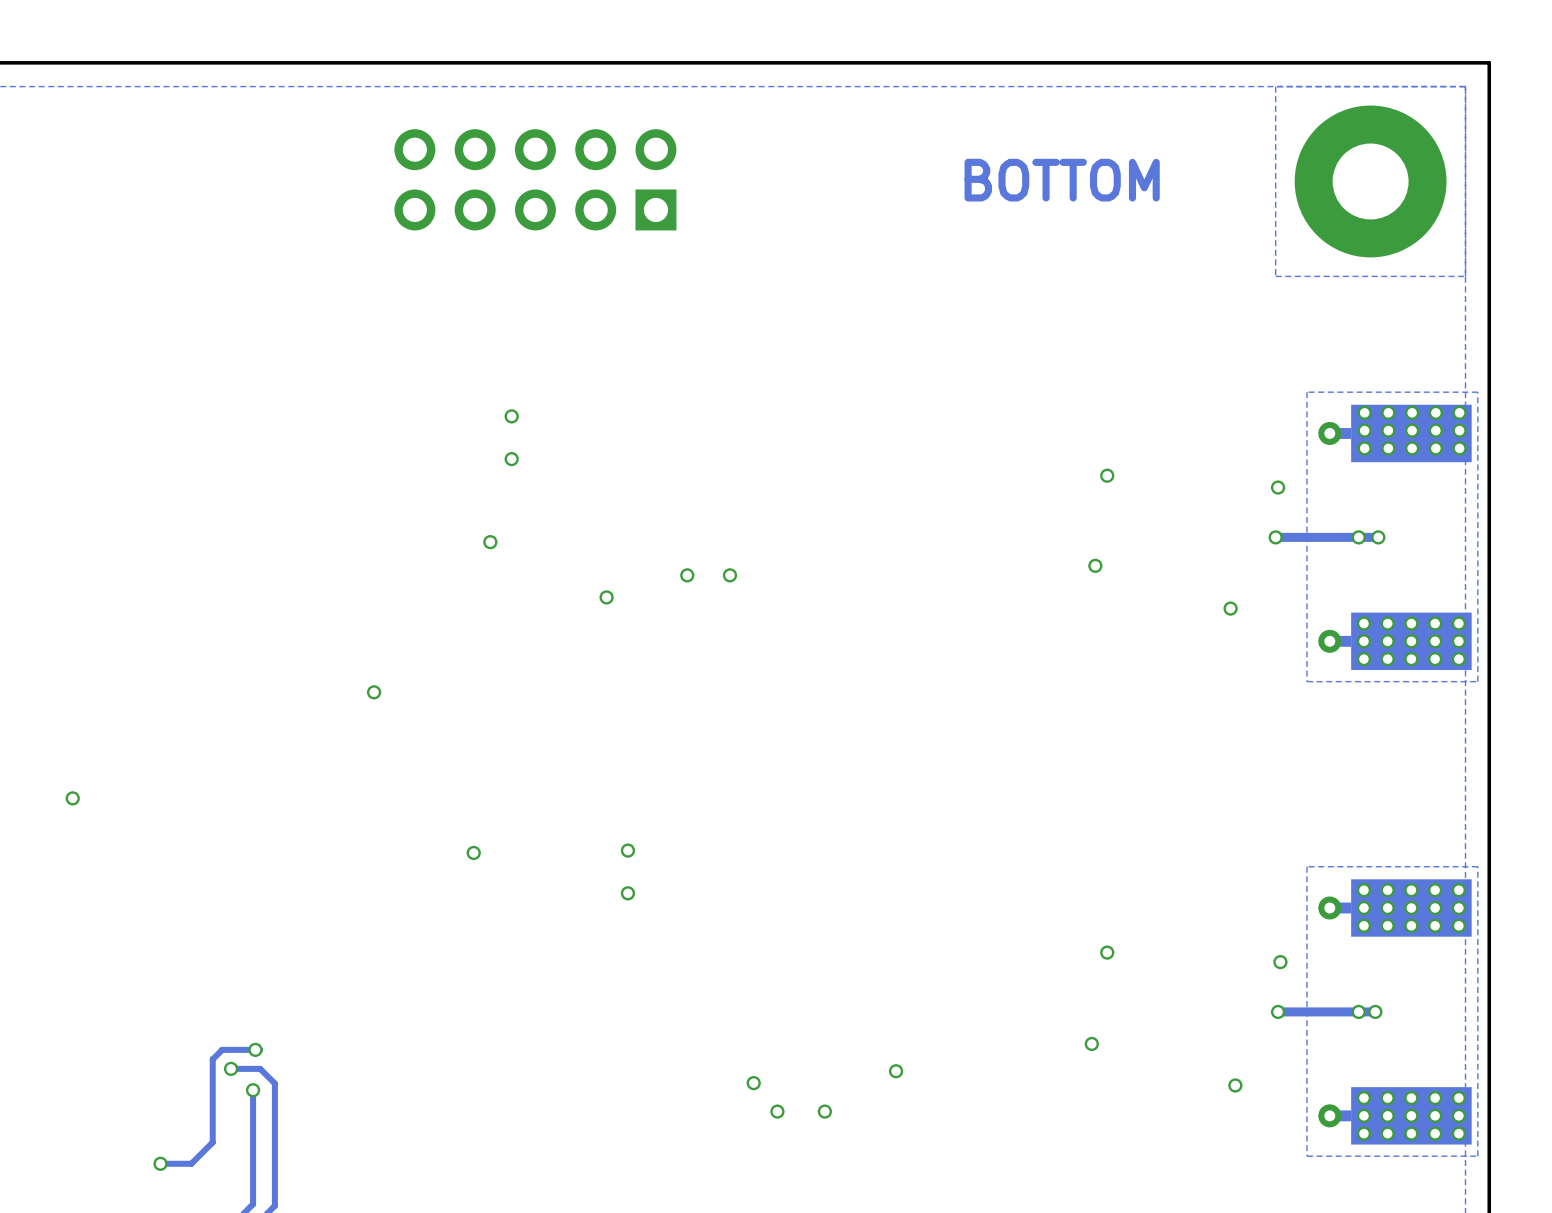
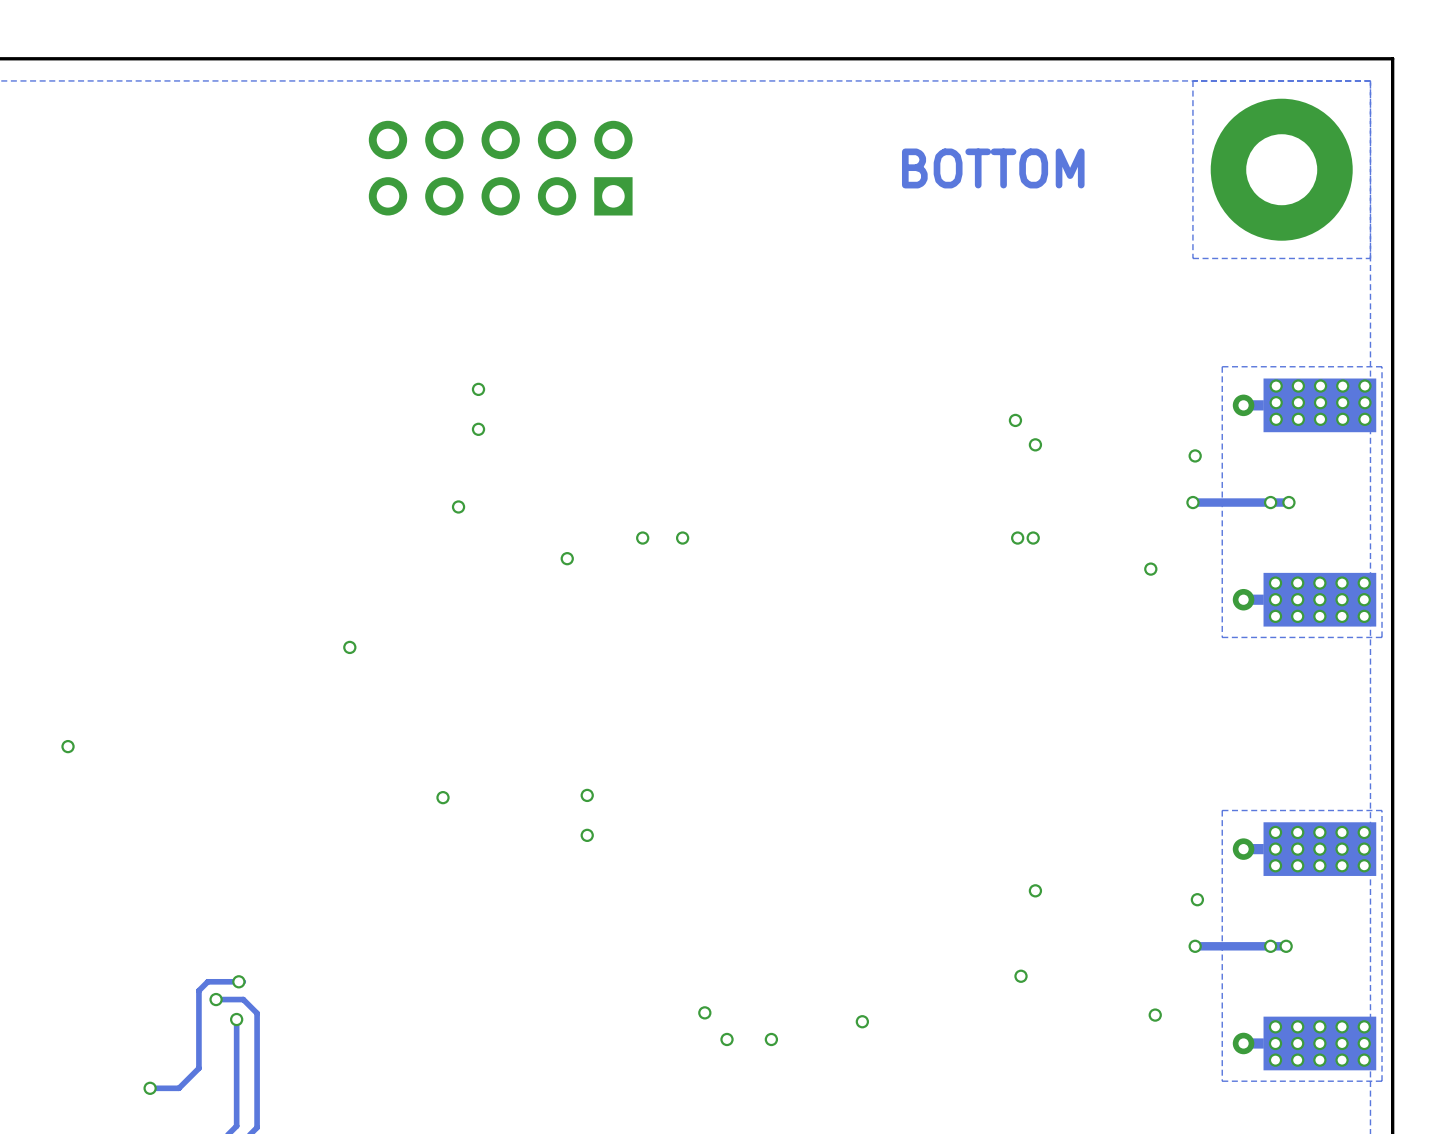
via: none -> (1015, 420)
via: (1095, 565) -> none
via: none -> (1017, 538)
via: none -> (1033, 538)
via position: (896, 1071) -> (862, 1021)

